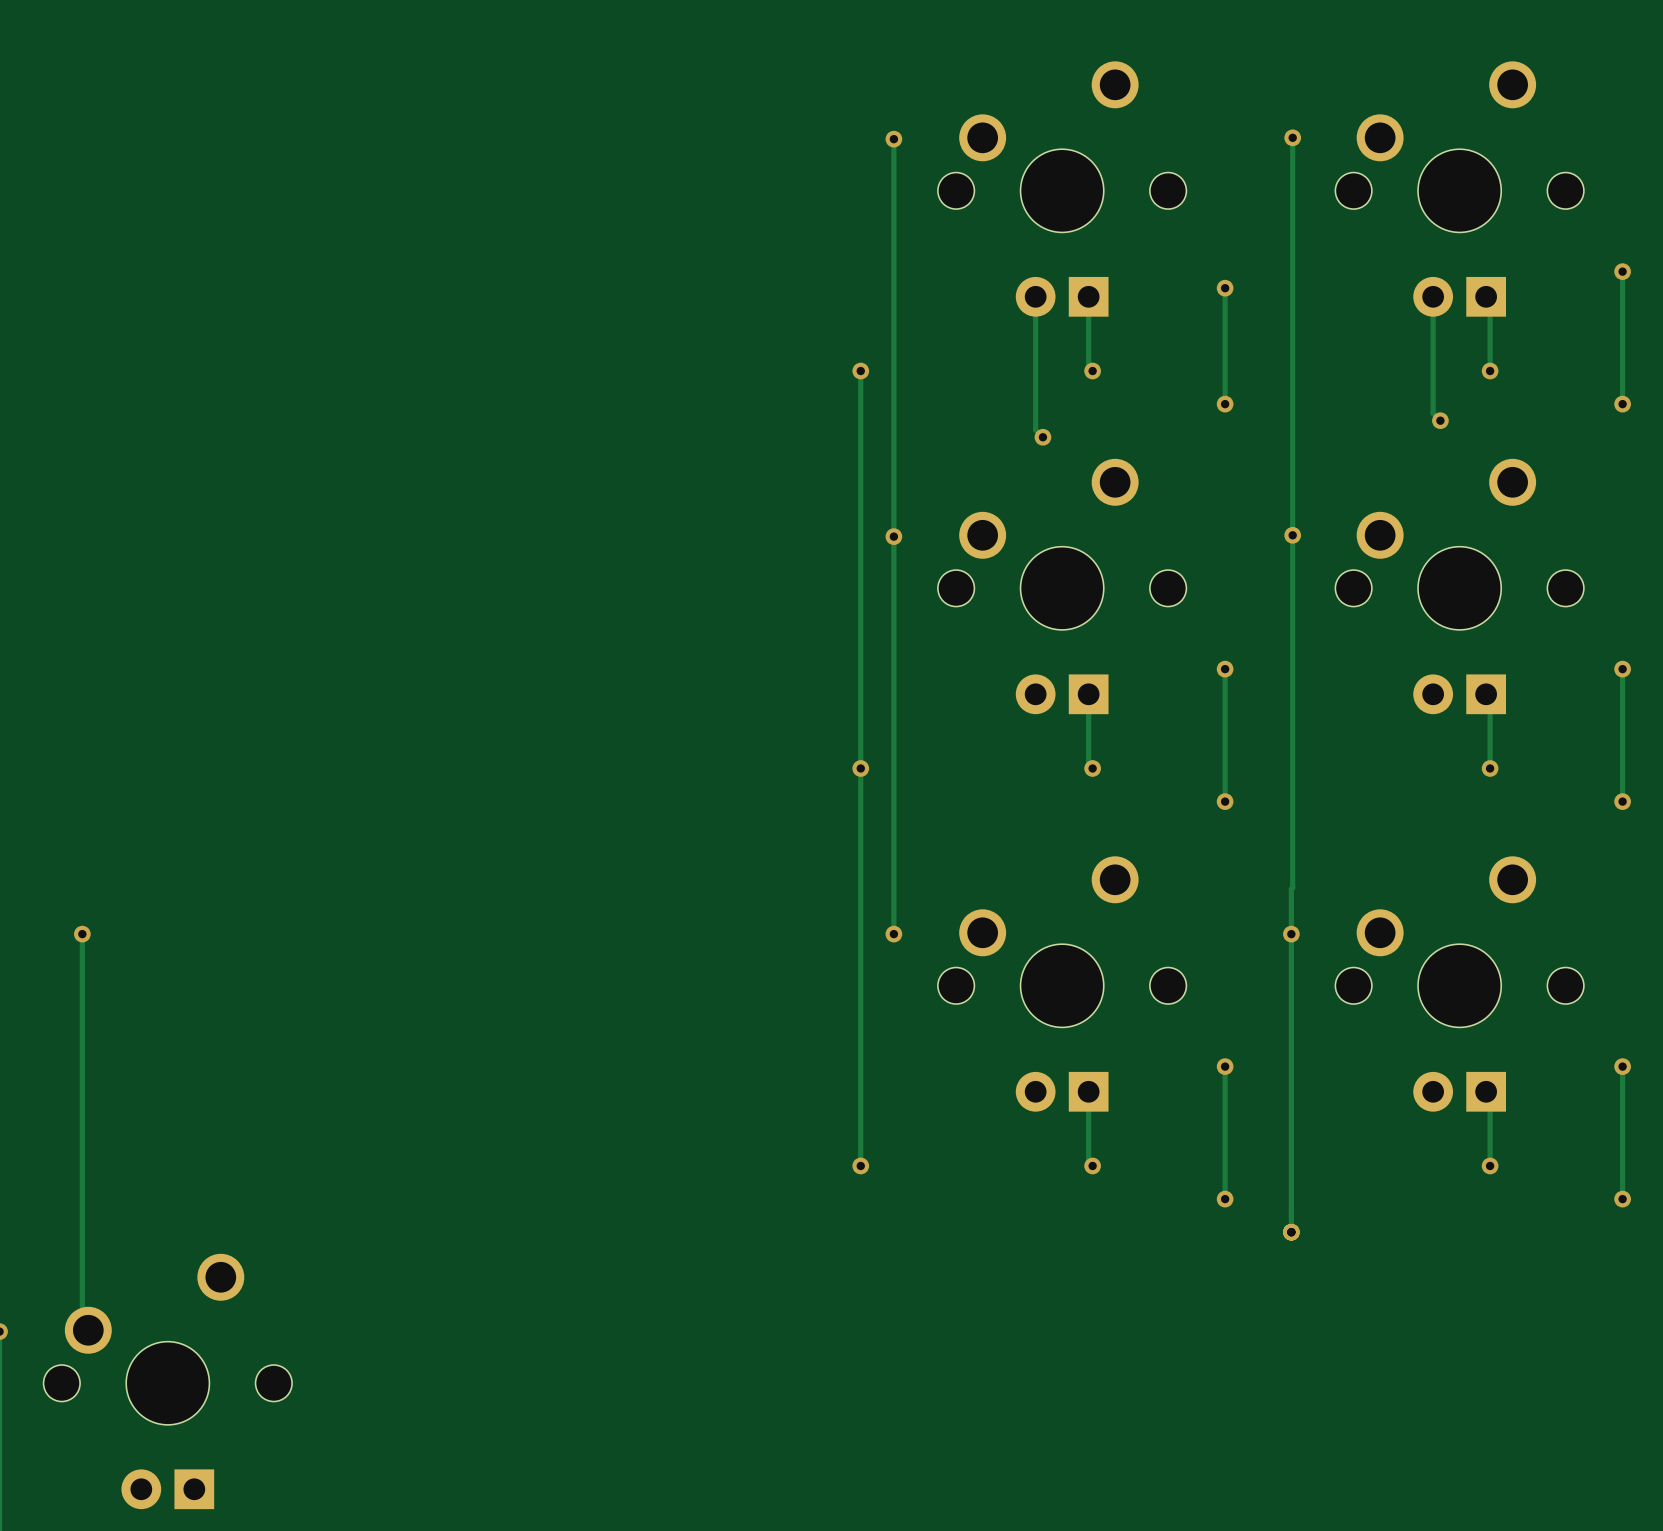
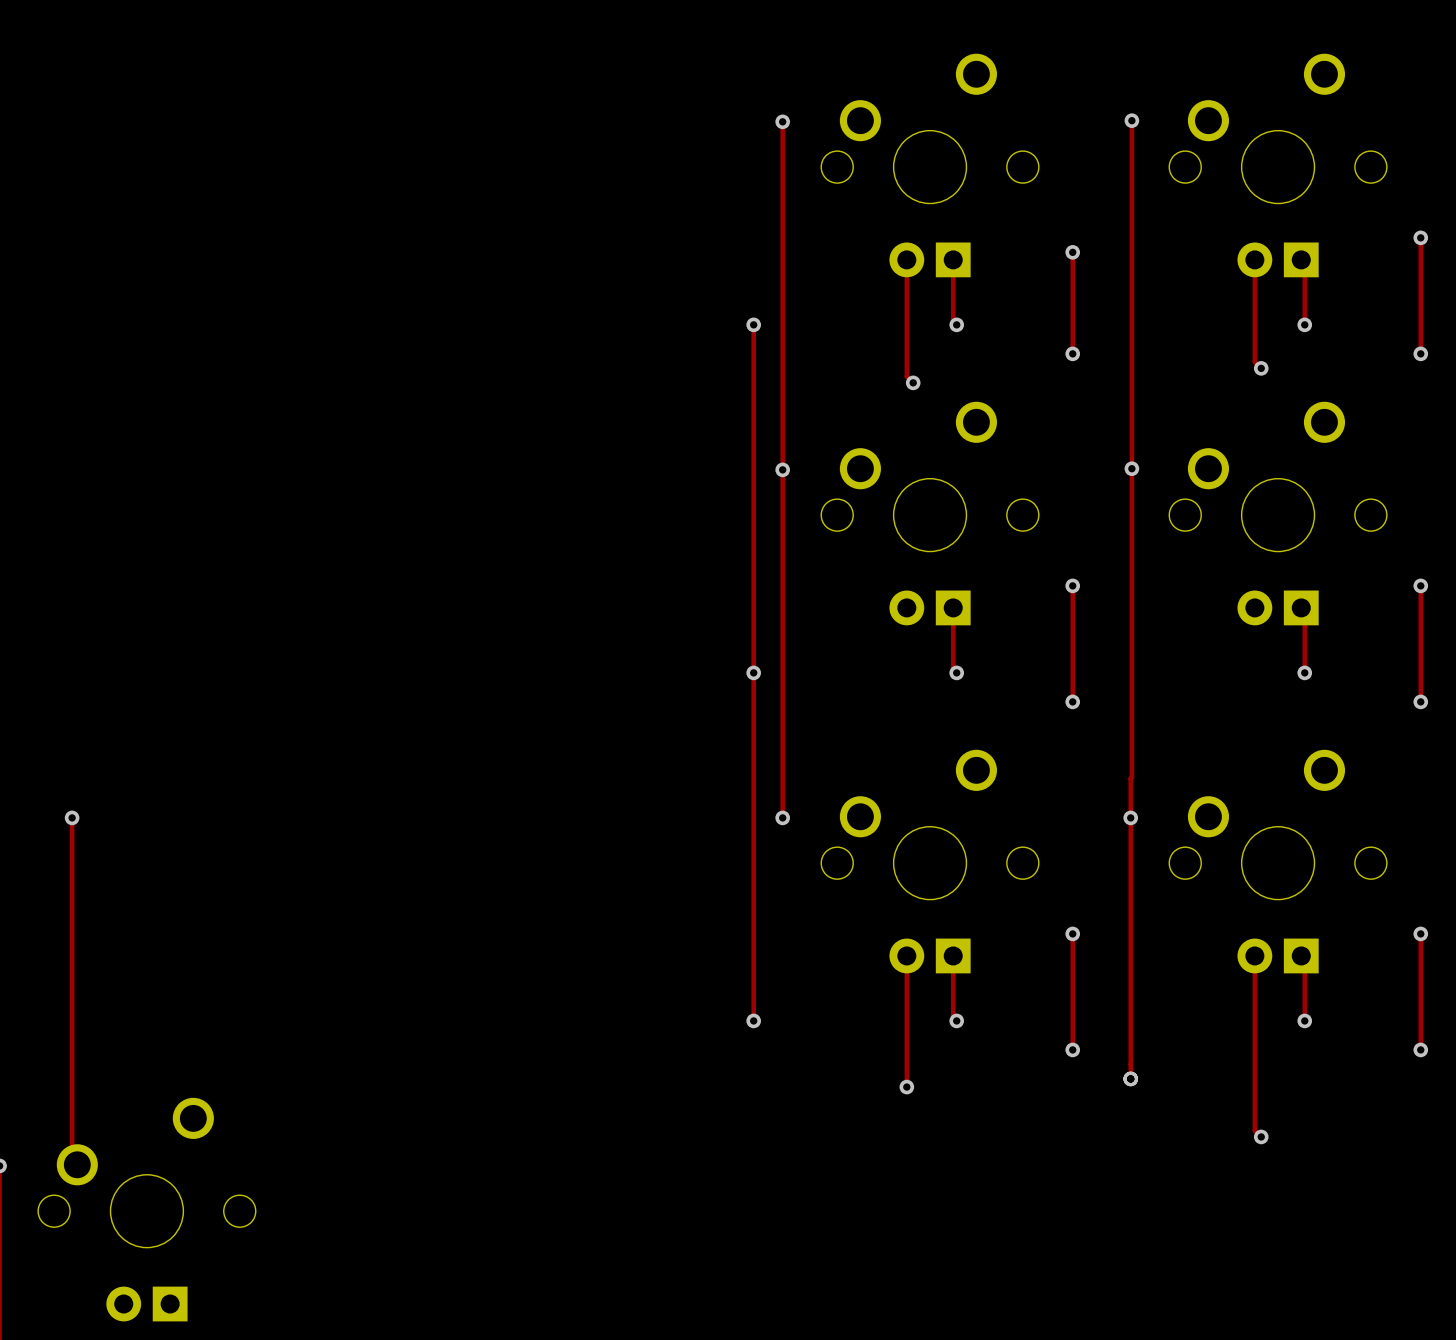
track: none -> (906, 955) (906, 1087)
track: none -> (1254, 955) (1254, 1130) (1261, 1136)
via: none -> (906, 1087)
via: none -> (1261, 1136)

